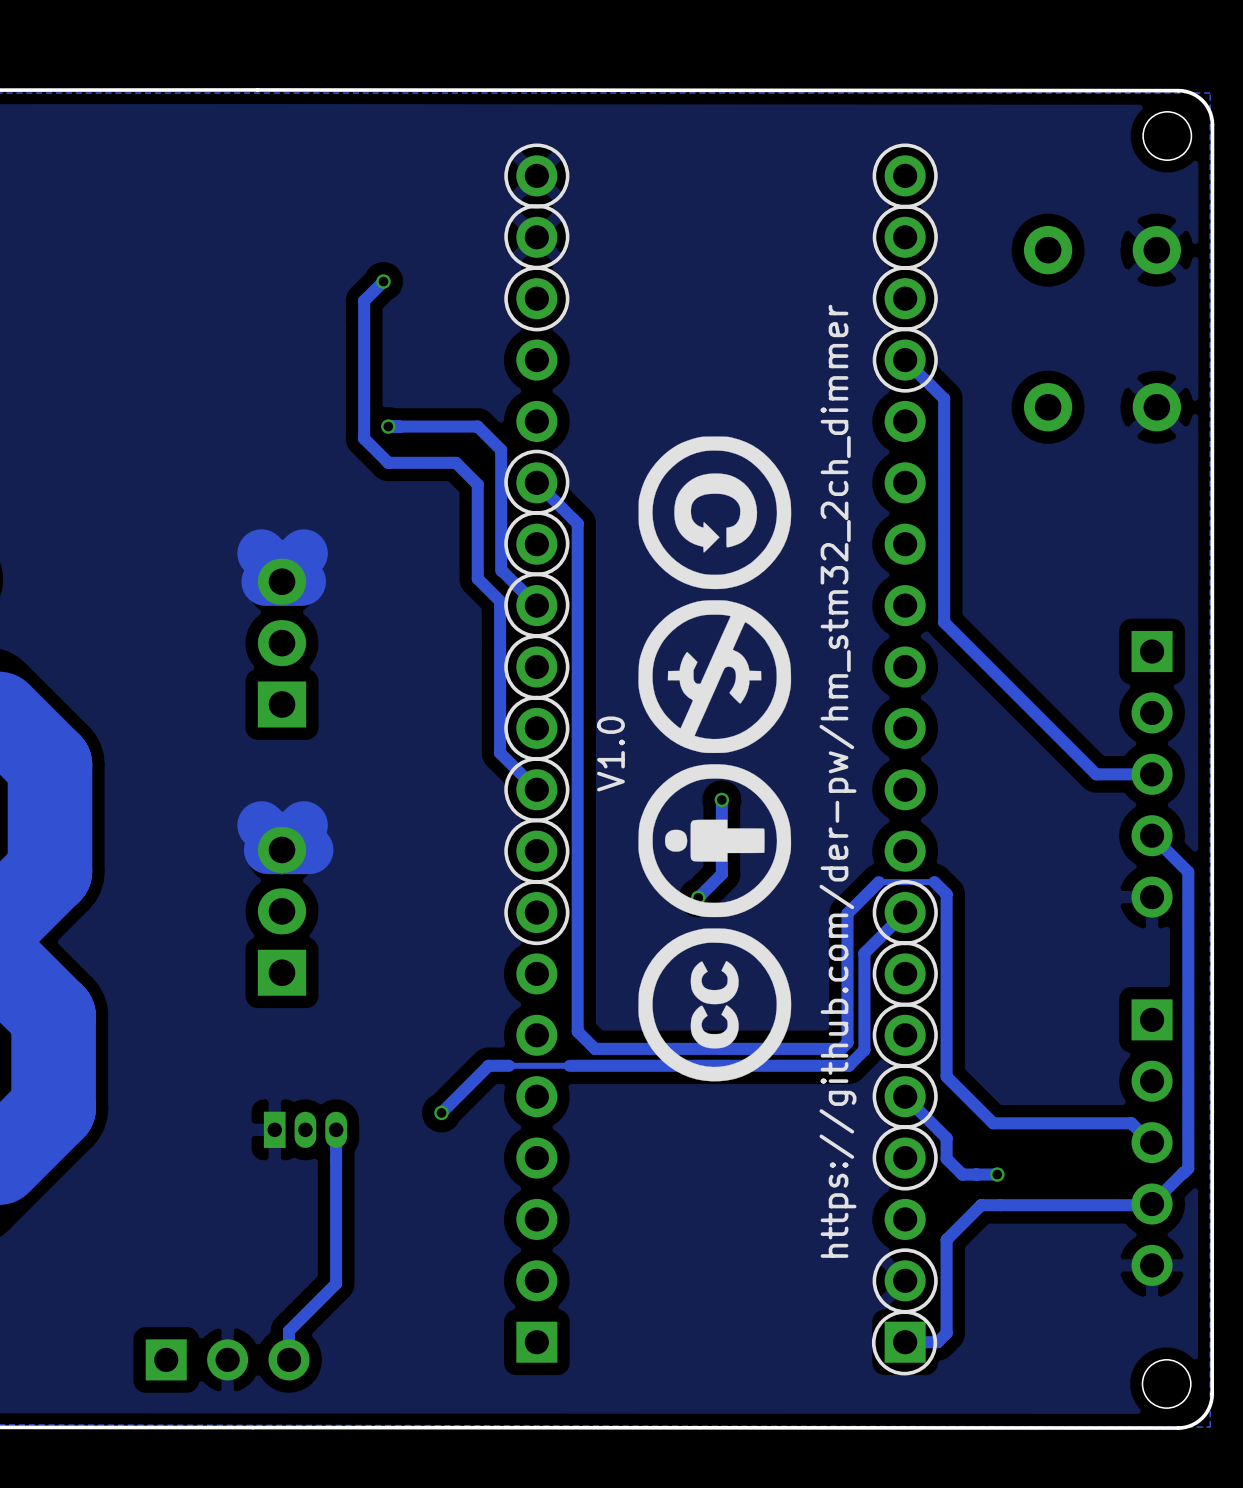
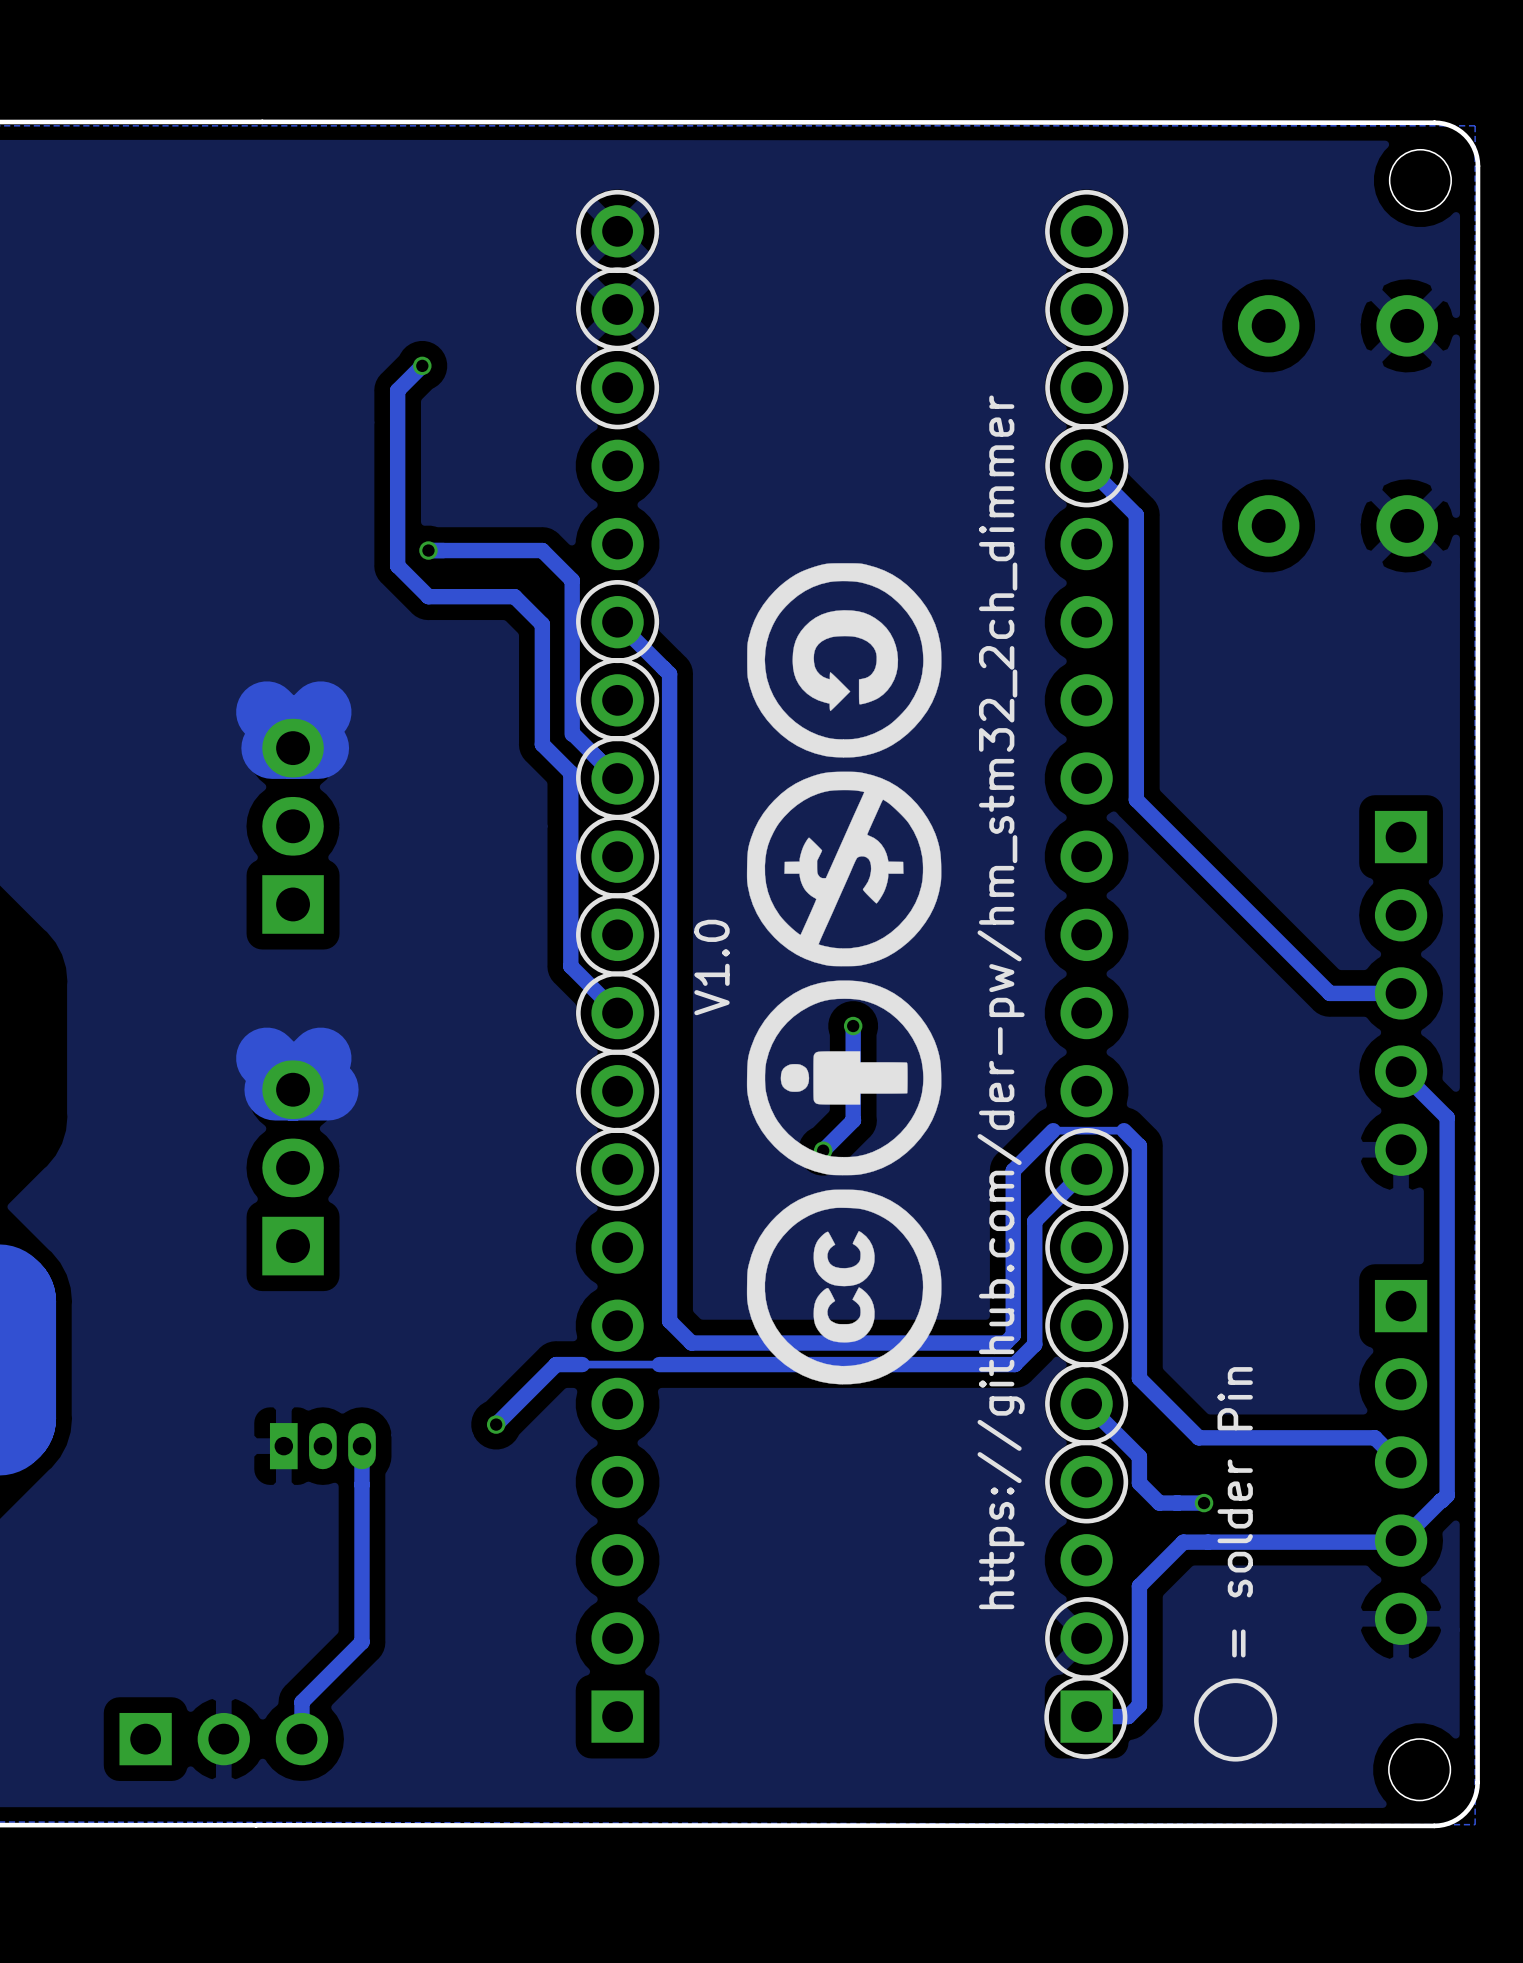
text: none -> = solder Pin (1235, 1512)
drawing: none -> [1194, 1678, 1278, 1762]

